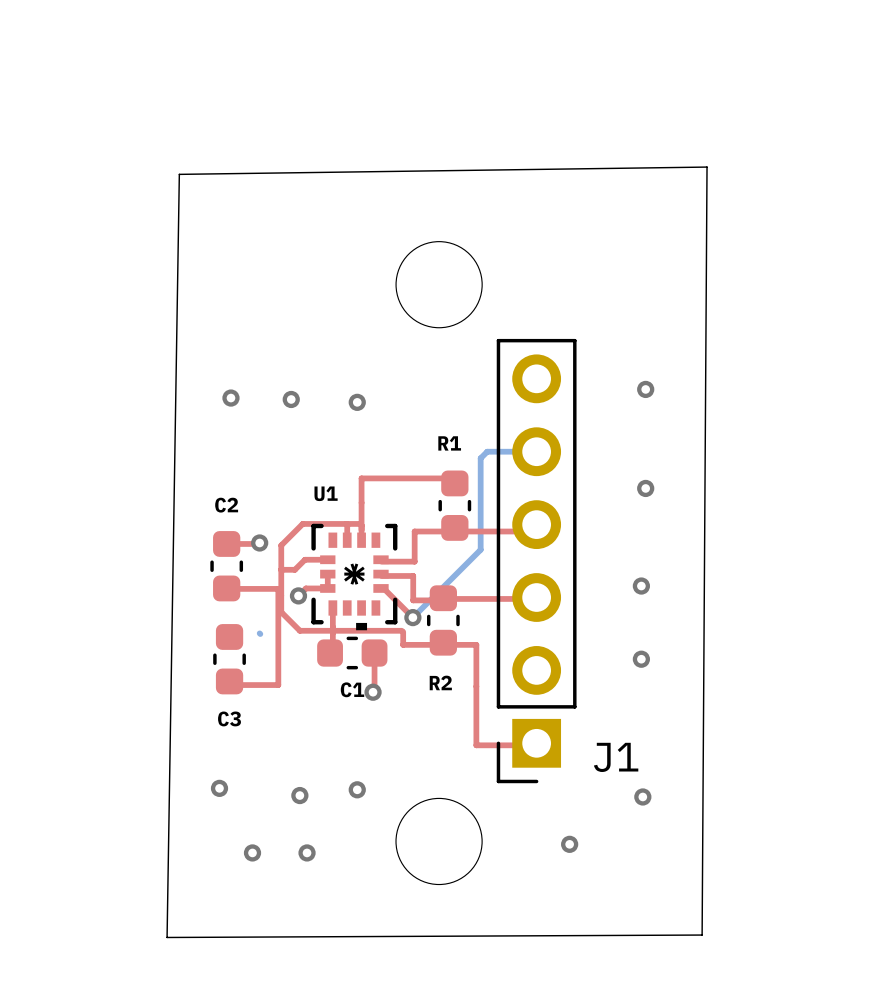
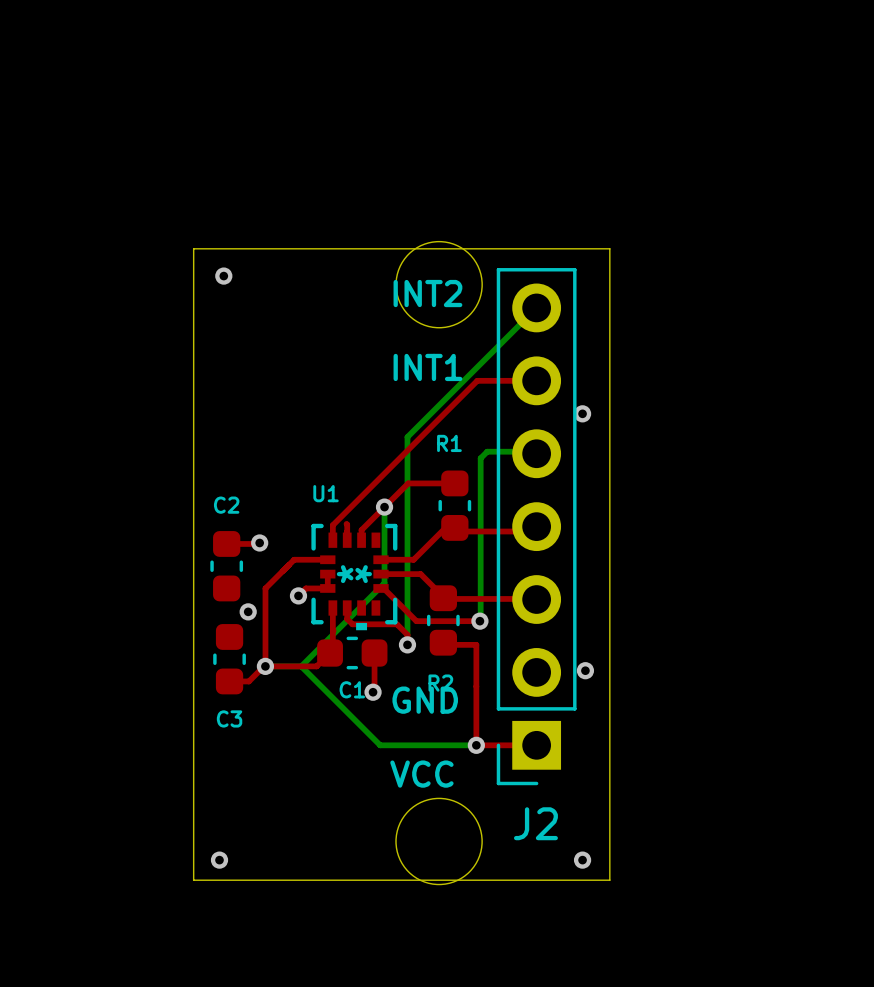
board edge: (707, 167) (179, 174) (167, 937) (702, 935) (707, 167) -> (193, 248) (193, 880) (609, 880) (609, 248) (193, 248)
via: none -> (223, 276)
text: none -> INT2 (427, 293)
bottom track: none -> (536, 307) (407, 437) (407, 644)
text: none -> INT1 (427, 367)
top track: none -> (536, 380) (477, 380) (332, 525) (332, 540)
via: (645, 389) -> none
via: (230, 398) -> none
via: (291, 399) -> none
via: (357, 402) -> none
via: none -> (582, 413)
top track: (449, 478) (361, 478) (361, 530) -> (444, 483) (408, 483) (361, 530)
via: (645, 488) -> none
bottom track: none -> (384, 507) (384, 583) (301, 666)
via: none -> (384, 507)
top track: (361, 525) (302, 523) (281, 545) (281, 612) (299, 630) (401, 630) -> none
J2: none -> (536, 526)
top track: none -> (444, 527) (413, 559) (381, 559)
top track: (459, 531) (414, 531) (414, 561) (381, 561) -> none
bottom track: (480, 549) (412, 617) -> (480, 549) (479, 621)
top track: (304, 559) (294, 569) (281, 569) -> (304, 559) (294, 559) (265, 588) (265, 664) (248, 681) (229, 681)
J1: (536, 561) -> none
top track: none -> (381, 574) (420, 574) (444, 598)
top track: (381, 575) (413, 575) (413, 600) (440, 600) -> none
via: (641, 586) -> none
top track: (229, 588) (278, 588) (278, 685) (235, 685) -> none
top track: none -> (347, 608) (347, 619) (352, 624) (396, 624) (407, 634) (407, 644)
via: none -> (248, 611)
top track: none -> (412, 617) (416, 621) (479, 621)
via position: (412, 617) -> (407, 644)
via: none -> (479, 621)
top track: (403, 631) (403, 644) (443, 644) -> none
bottom track: (259, 633) (260, 634) -> none
top track: none -> (330, 653) (316, 666) (265, 666)
via: (641, 659) -> none
via: none -> (265, 666)
bottom track: none -> (301, 666) (380, 745) (476, 745)
via: none -> (585, 670)
text: none -> GND (425, 700)
via: none -> (476, 745)
text: none -> VCC (421, 774)
via: (219, 788) -> none
via: (357, 789) -> none
via: (299, 795) -> none
via: (642, 796) -> none
via position: (569, 844) -> (582, 860)
via position: (252, 852) -> (219, 860)
via: (307, 852) -> none

